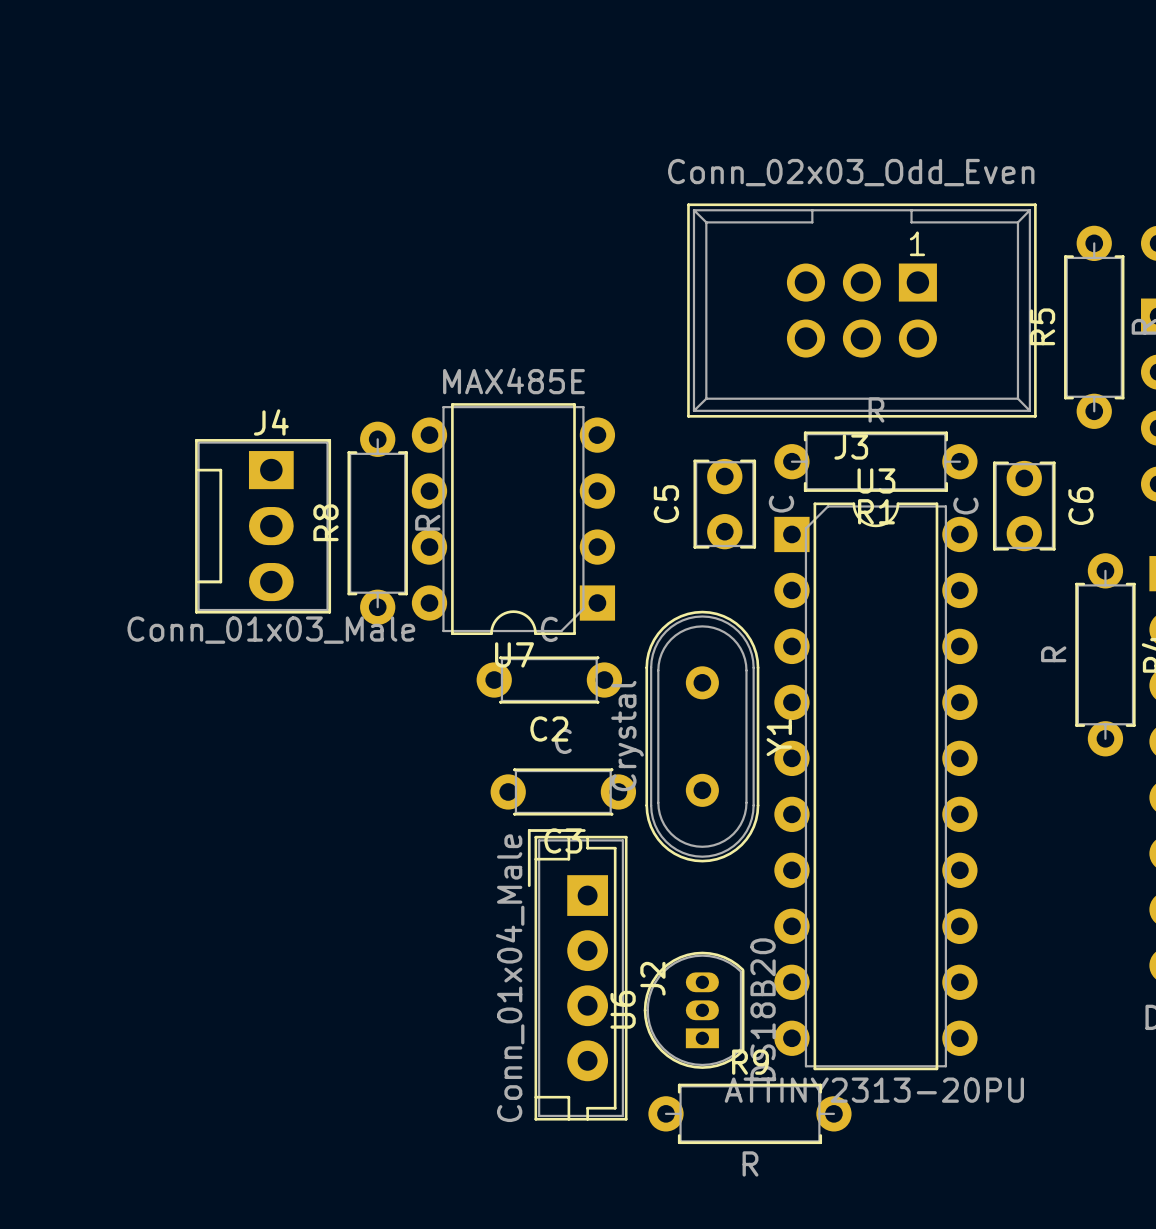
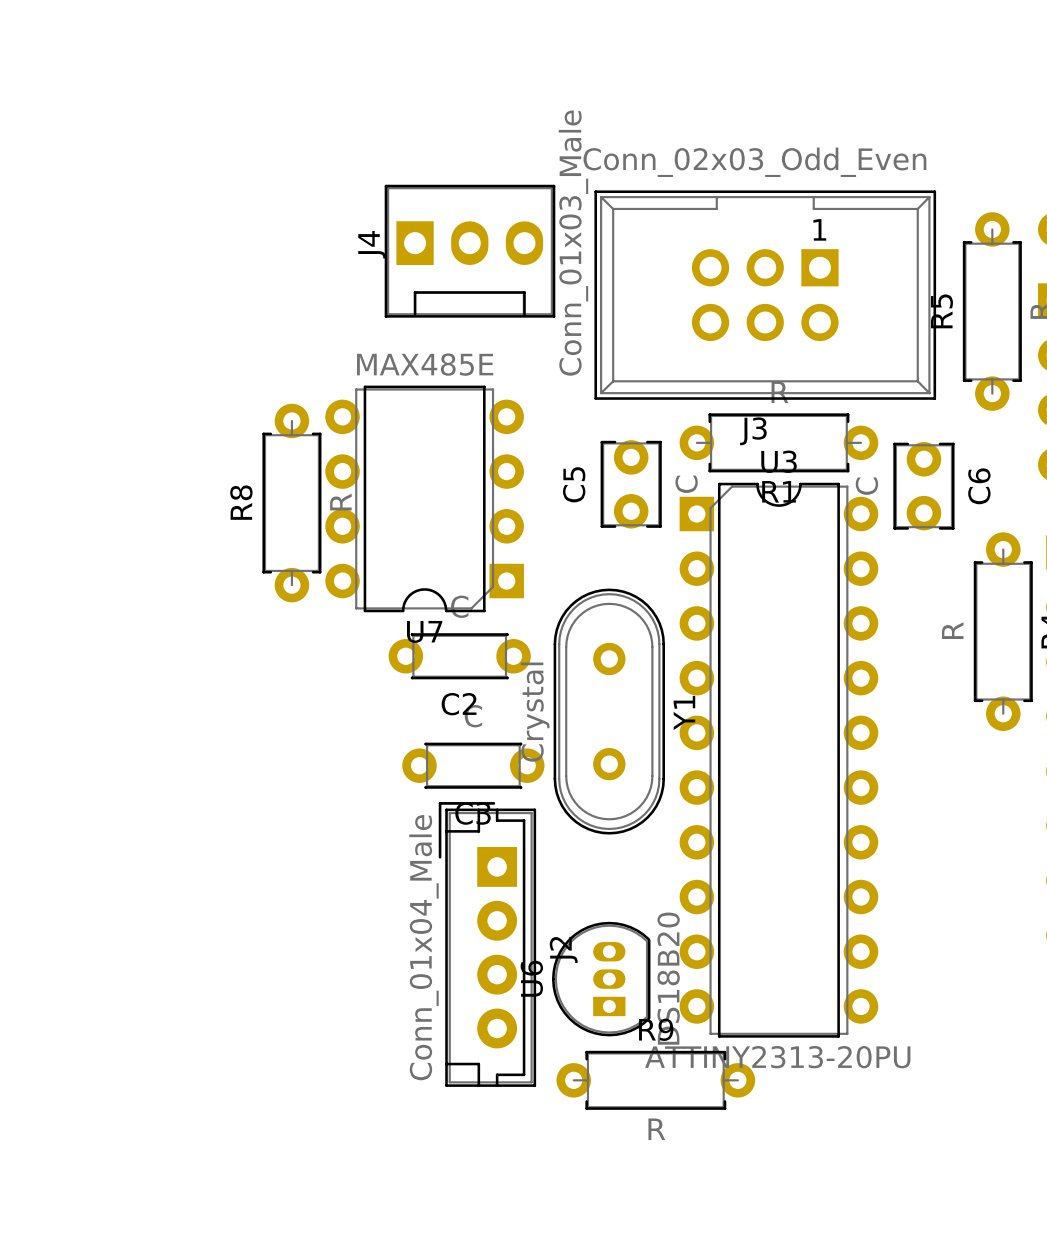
J4 rotation: 0° (263, 526) -> 90° counterclockwise (469, 251)
J4 position: (263, 526) -> (469, 251)

